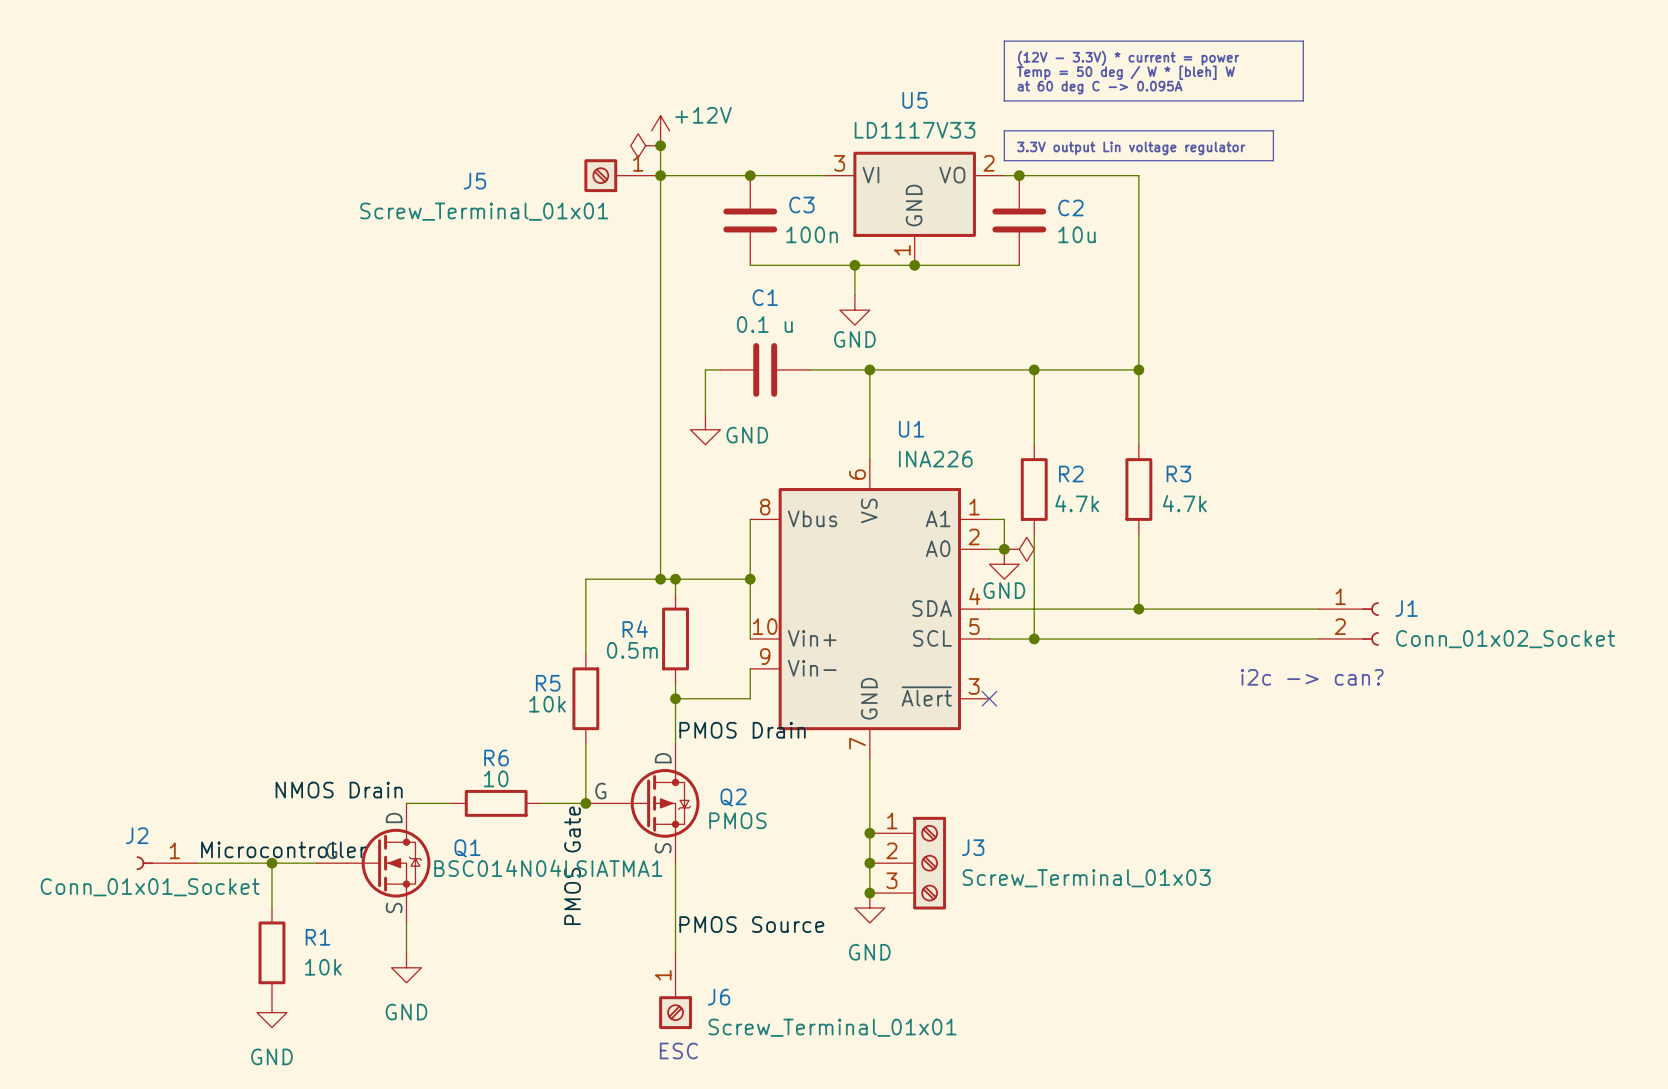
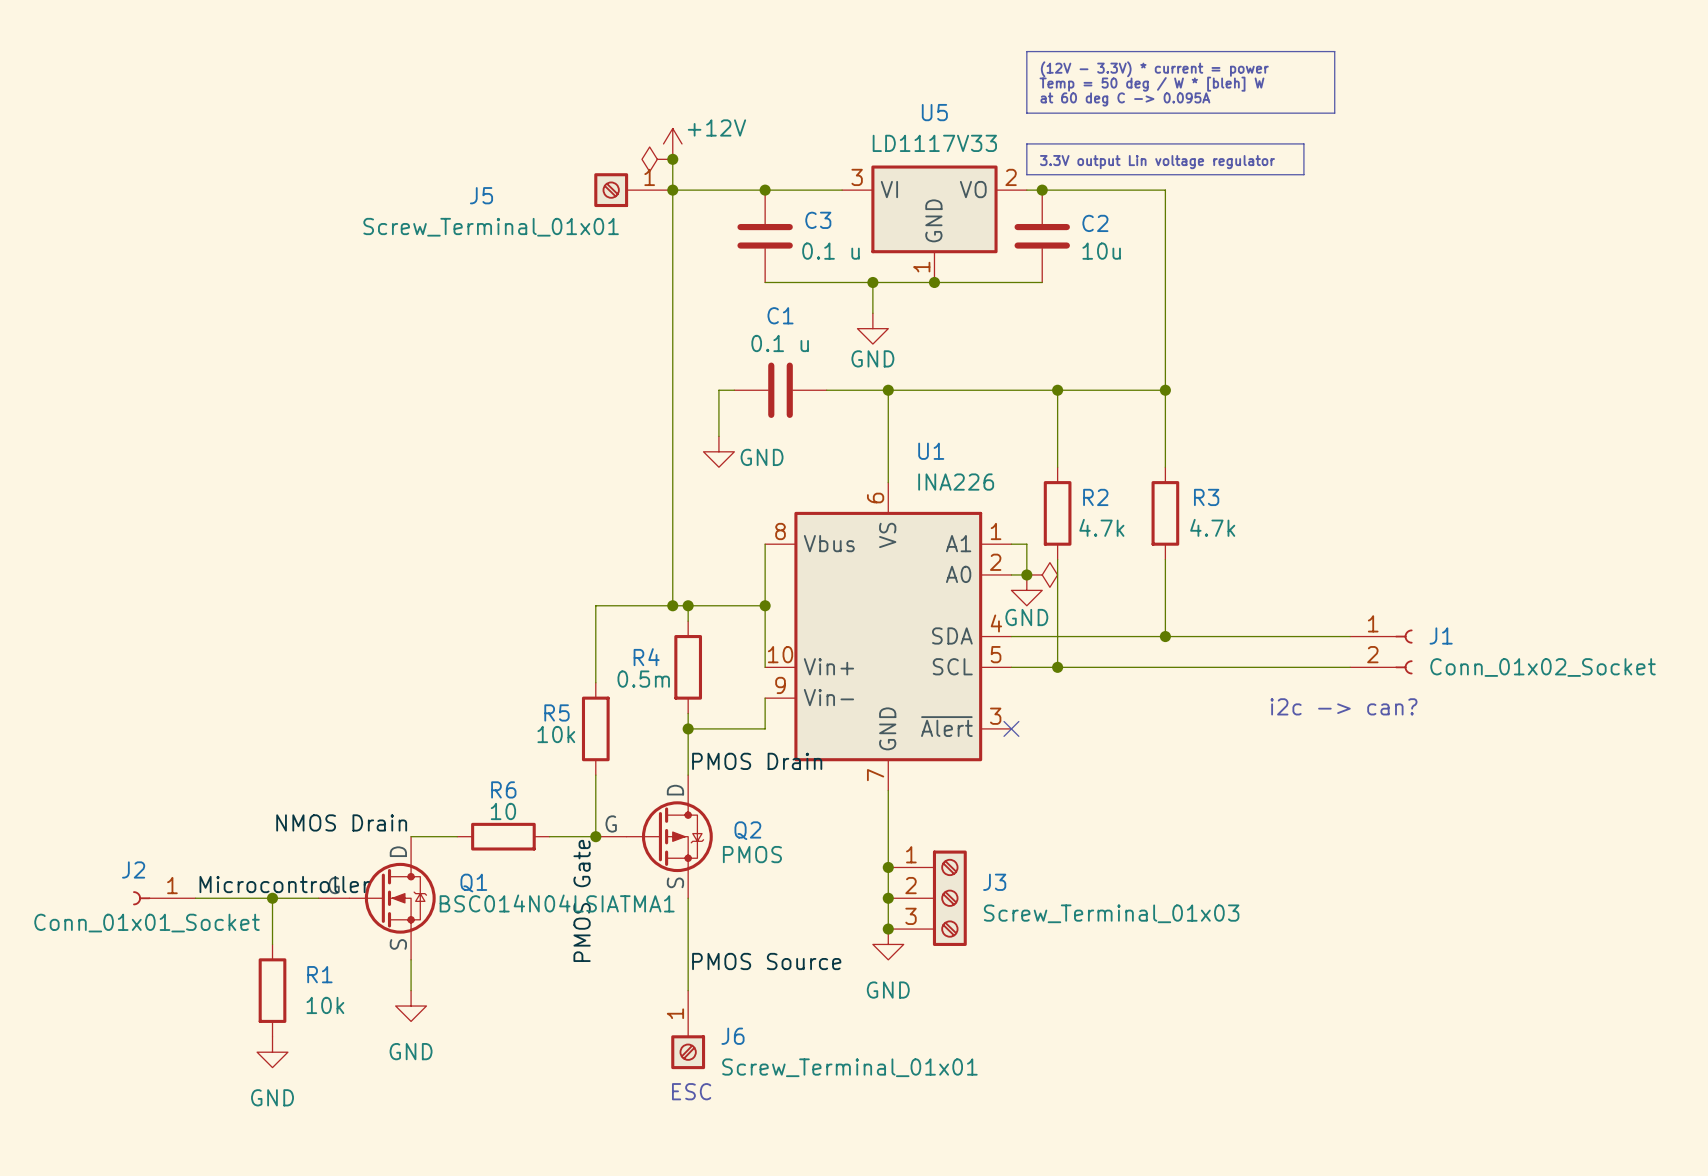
C3 value: 100n (812, 234) -> 0.1 u (831, 251)

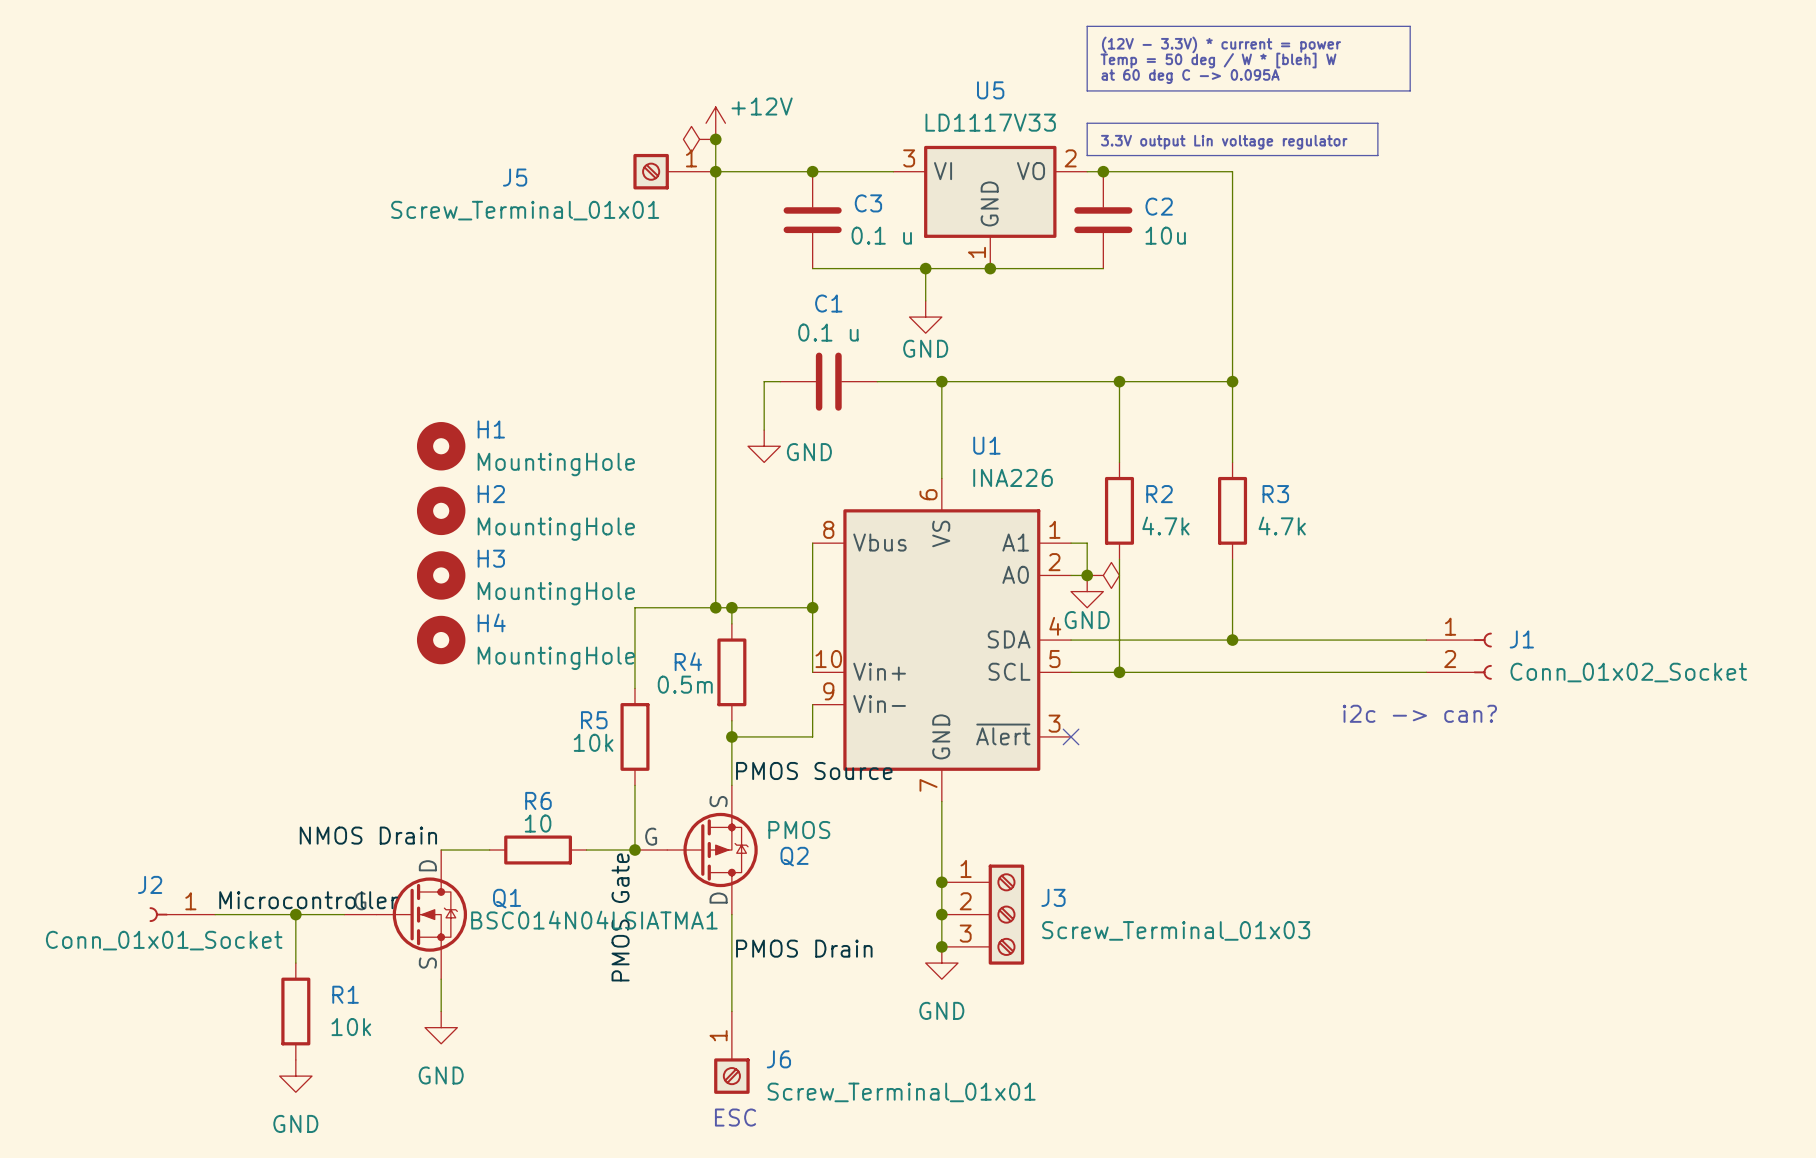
H1: none -> MountingHole (441, 446)
H2: none -> MountingHole (441, 510)
H3: none -> MountingHole (441, 575)
H4: none -> MountingHole (441, 640)
label: PMOS Drain (757, 761) -> PMOS Source (814, 770)
Q2 flip: as is (669, 836) -> up-down (712, 850)
label: none -> PMOS Drain (804, 948)
label: PMOS Source (766, 961) -> none

